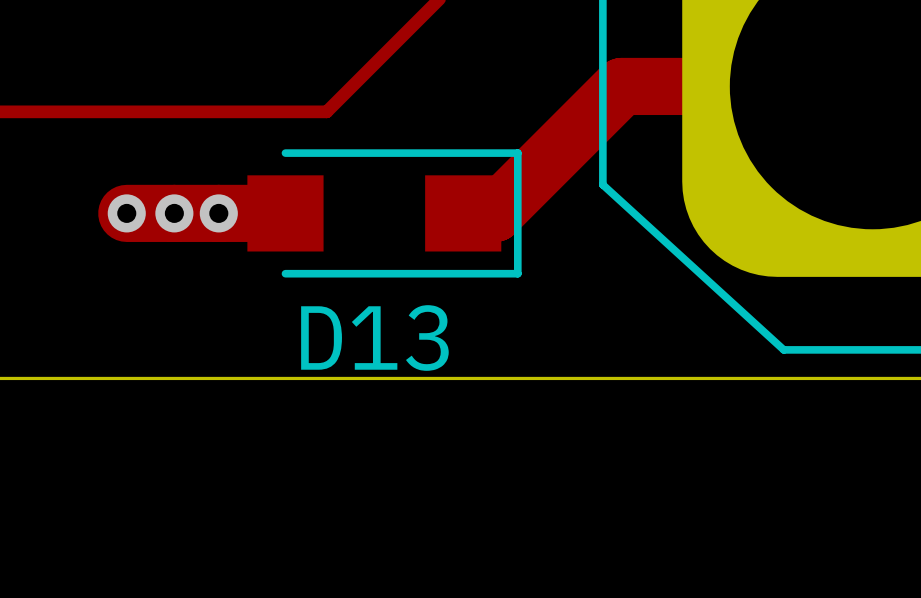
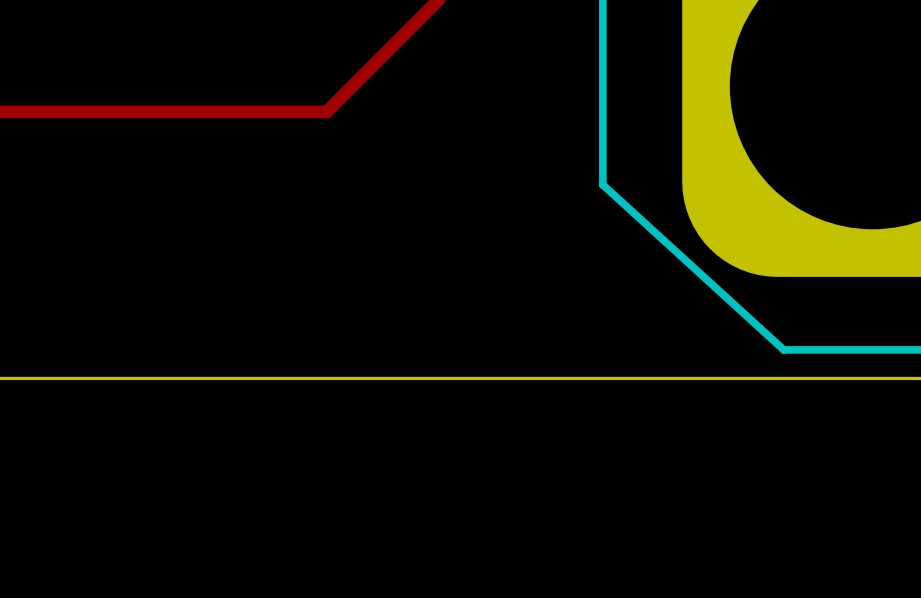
top track: (872, 86) (621, 86) (494, 213) (463, 213) -> none
top track: (126, 213) (285, 213) -> none
via: (126, 213) -> none
via: (174, 213) -> none
via: (218, 213) -> none
D13: (384, 213) -> none

